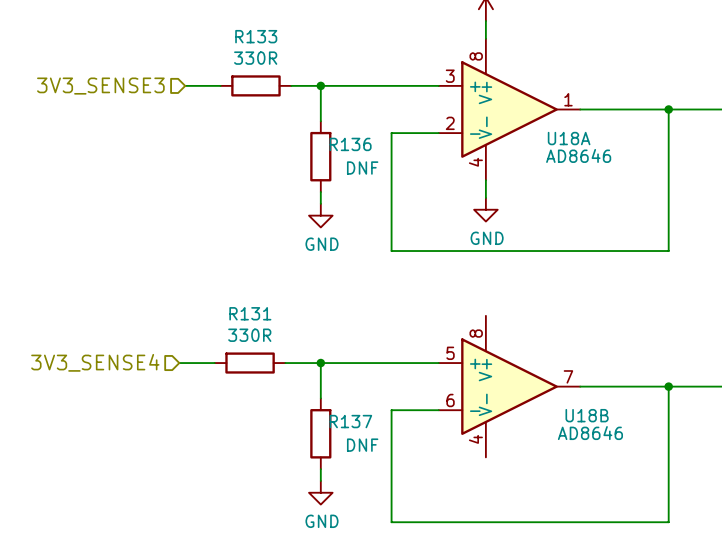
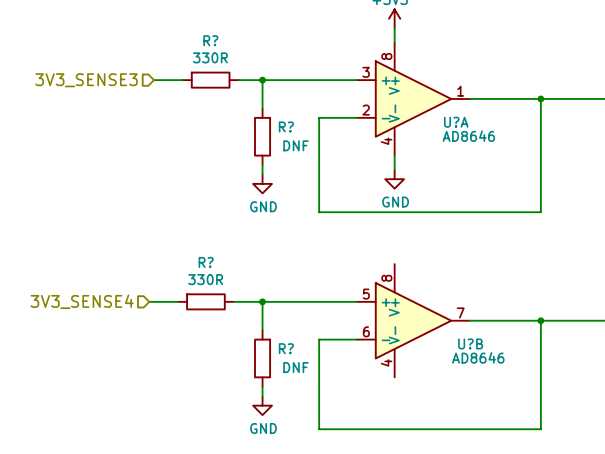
R133 name: R133 (256, 36) -> R? (210, 40)
U18A name: U18A (569, 138) -> U?A (456, 122)
R136 name: R136 (350, 144) -> R? (286, 126)
R131 name: R131 (250, 313) -> R? (206, 262)
U18B name: U18B (587, 415) -> U?B (470, 343)
R137 name: R137 (350, 421) -> R? (286, 348)

